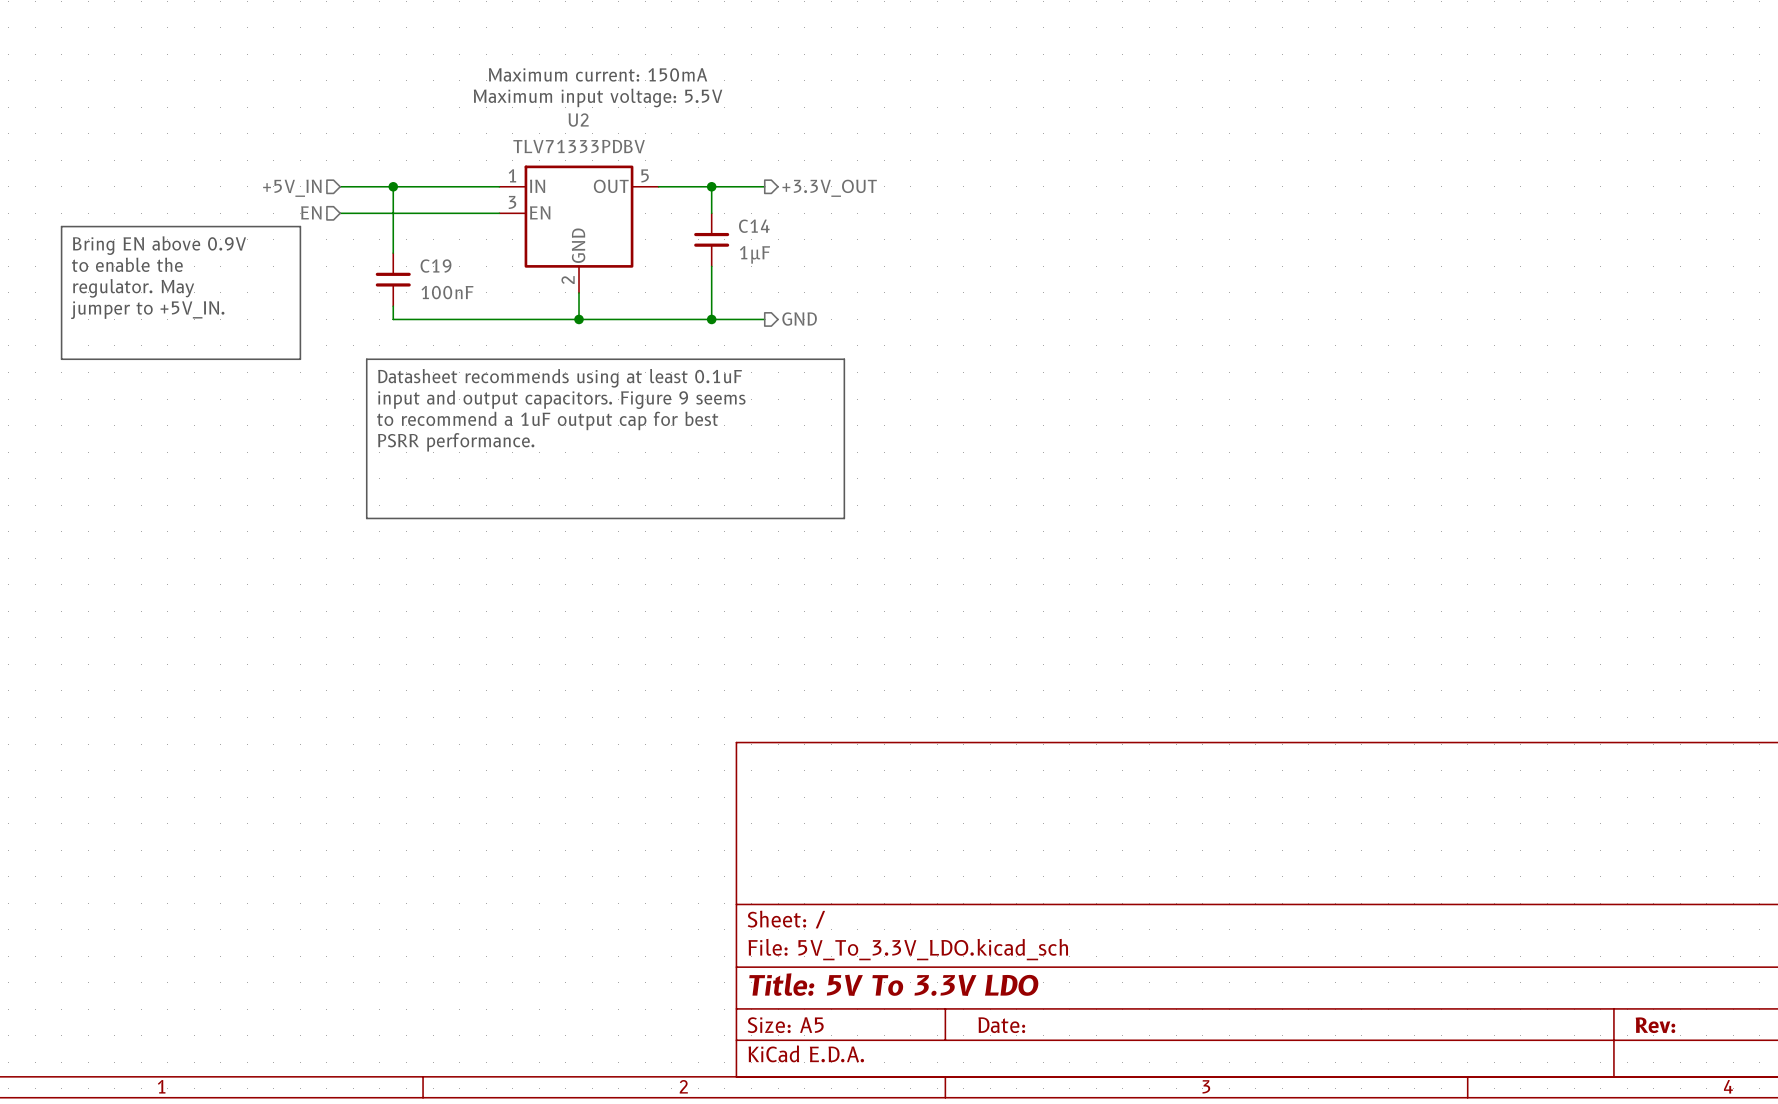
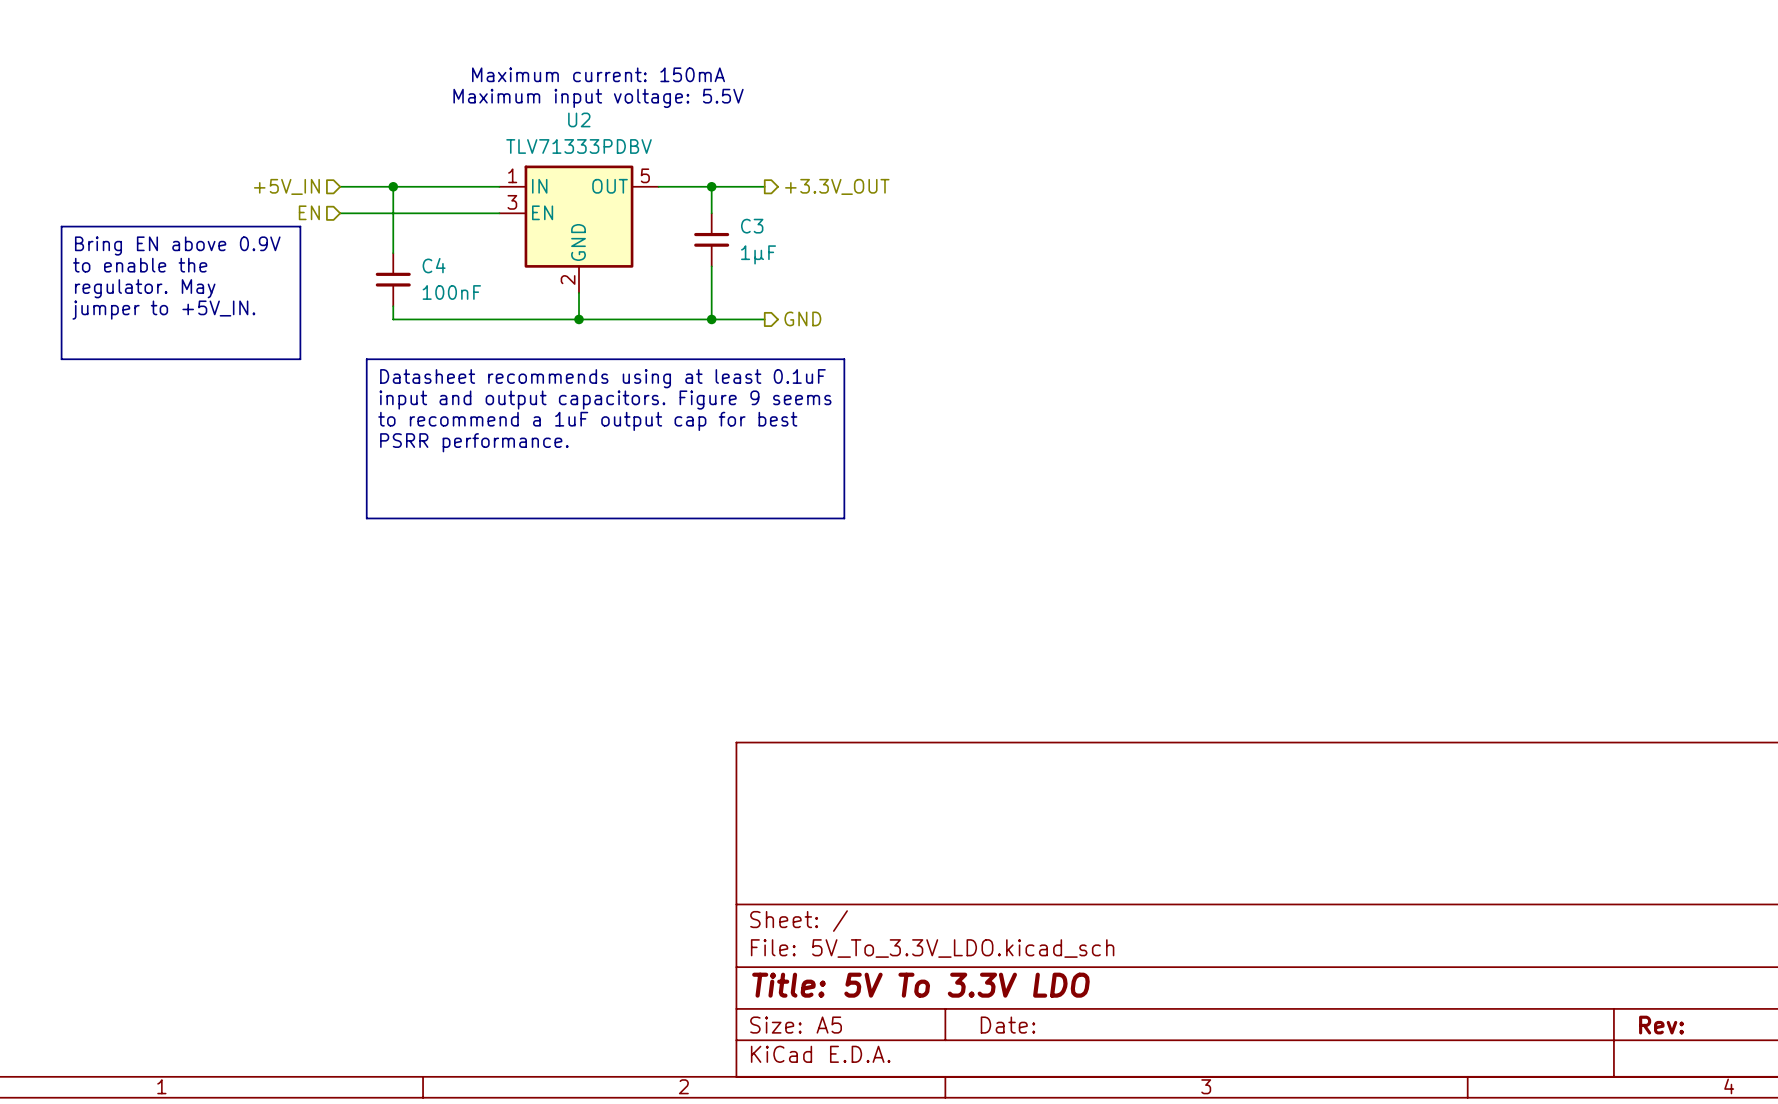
C14 name: C14 (754, 226) -> C3 (752, 226)
C19 name: C19 (435, 266) -> C4 (434, 265)

